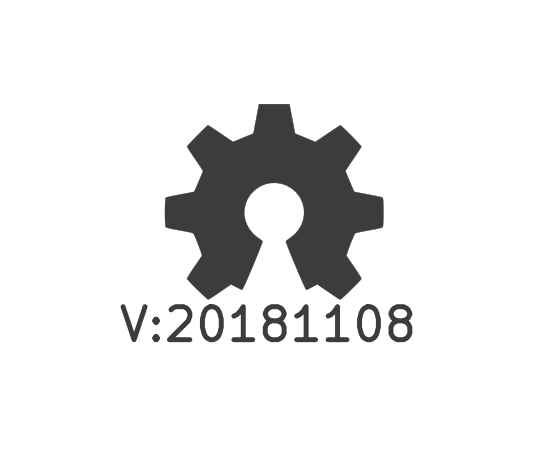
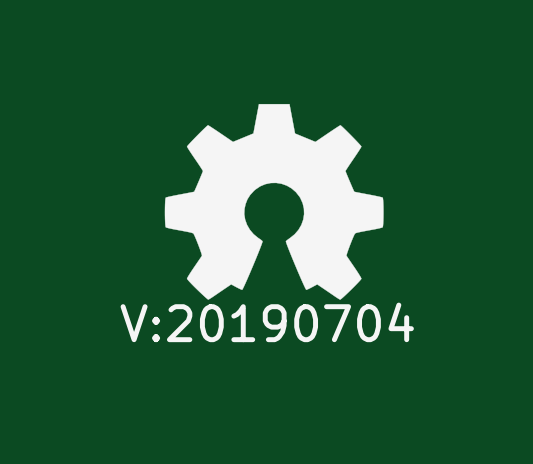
drawing shape: [120, 304, 413, 343] -> [120, 302, 414, 343]

